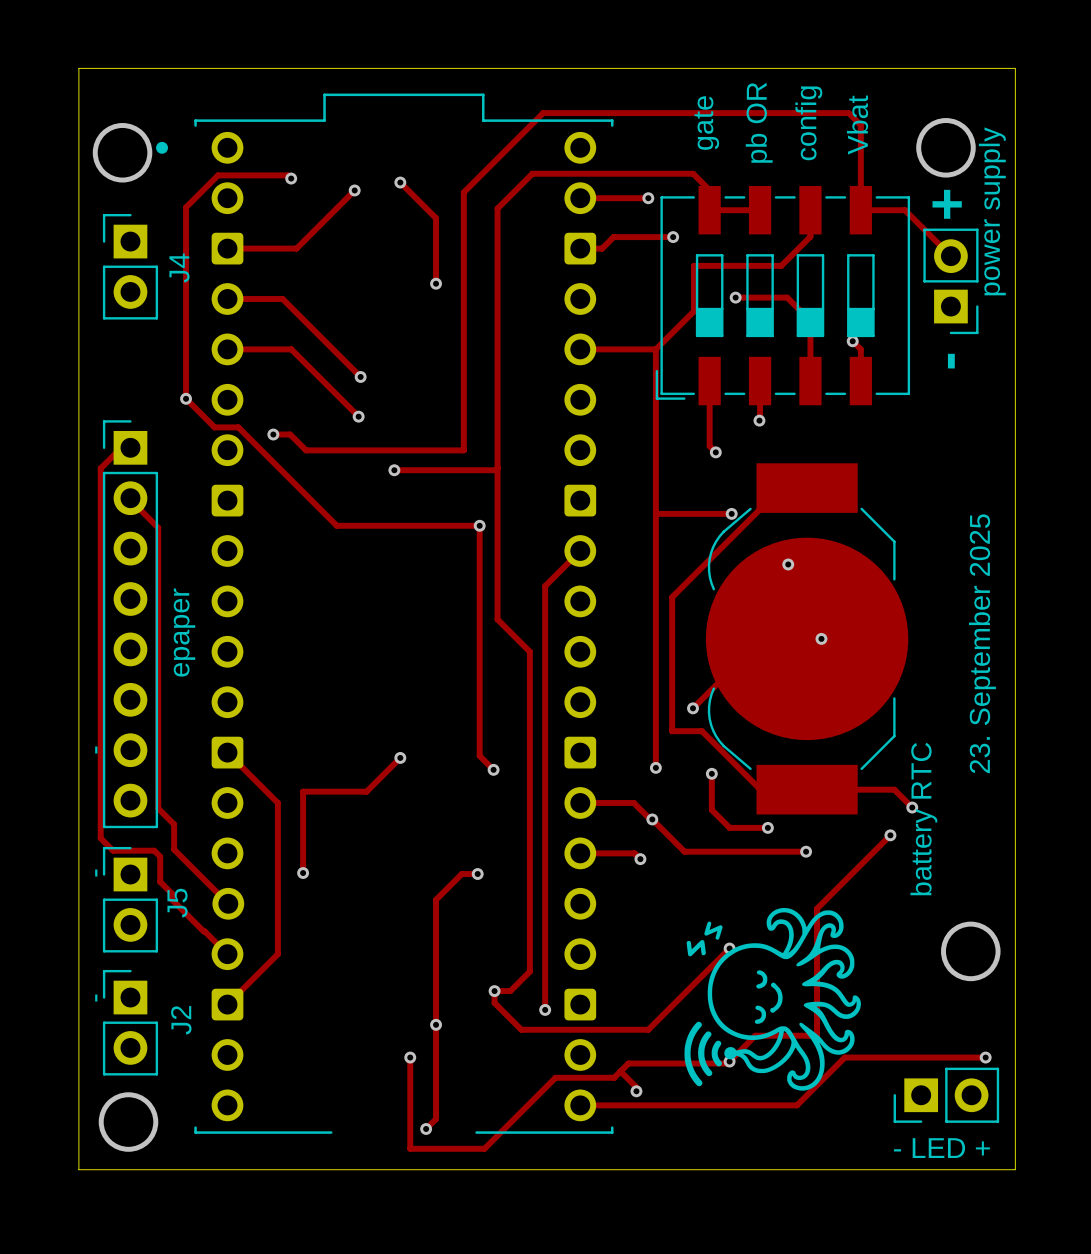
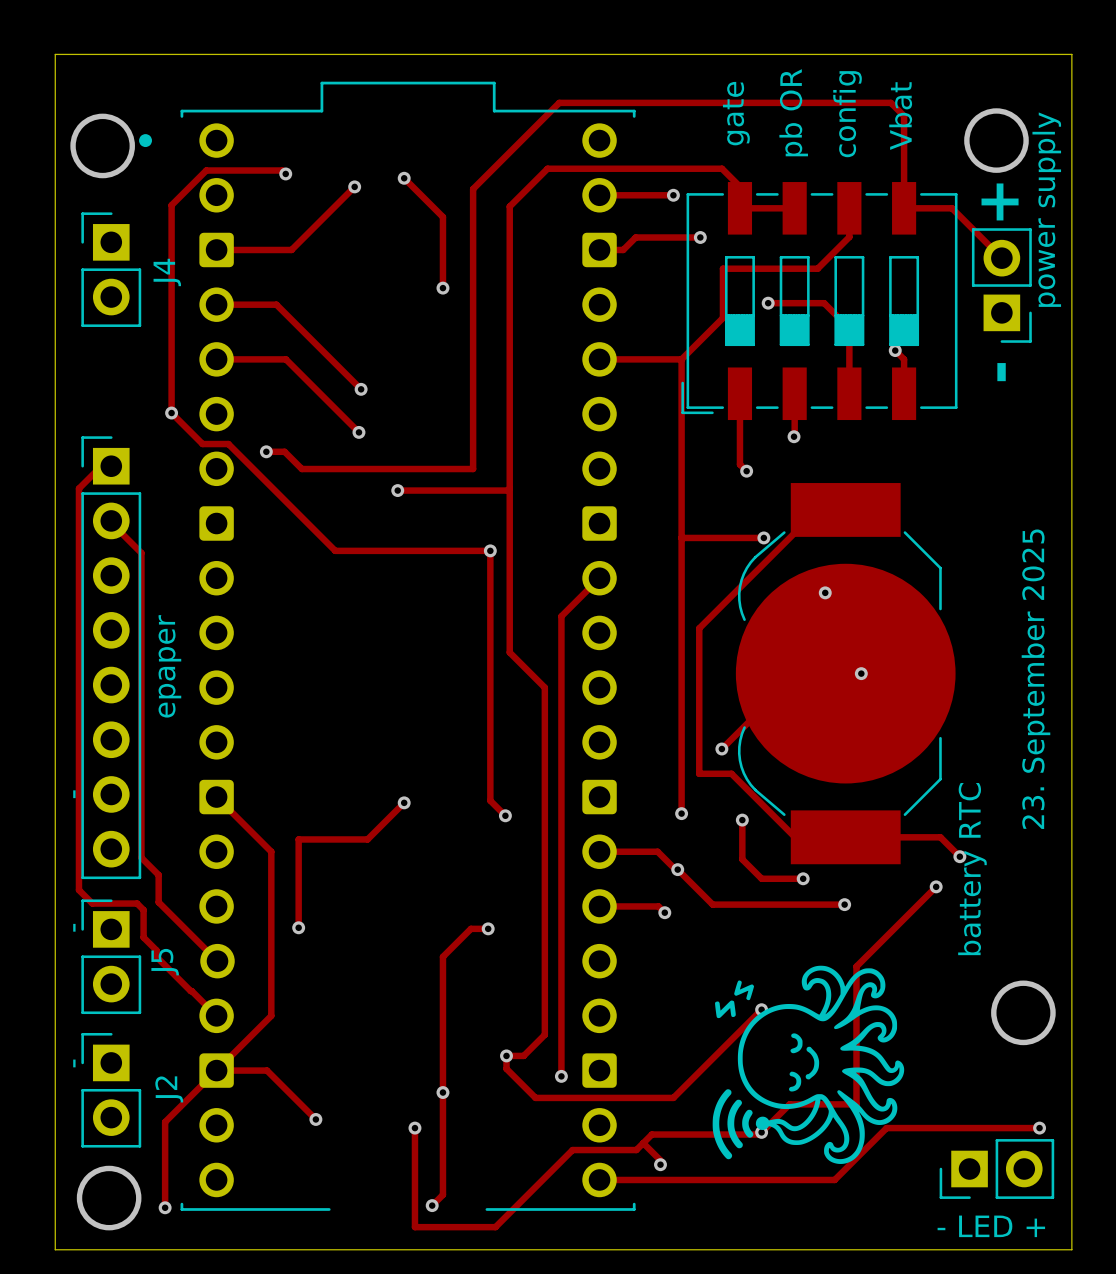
track: none -> (315, 1119) (267, 1070) (216, 1070) (165, 1122) (165, 1207)
via: none -> (315, 1119)
via: none -> (165, 1207)

